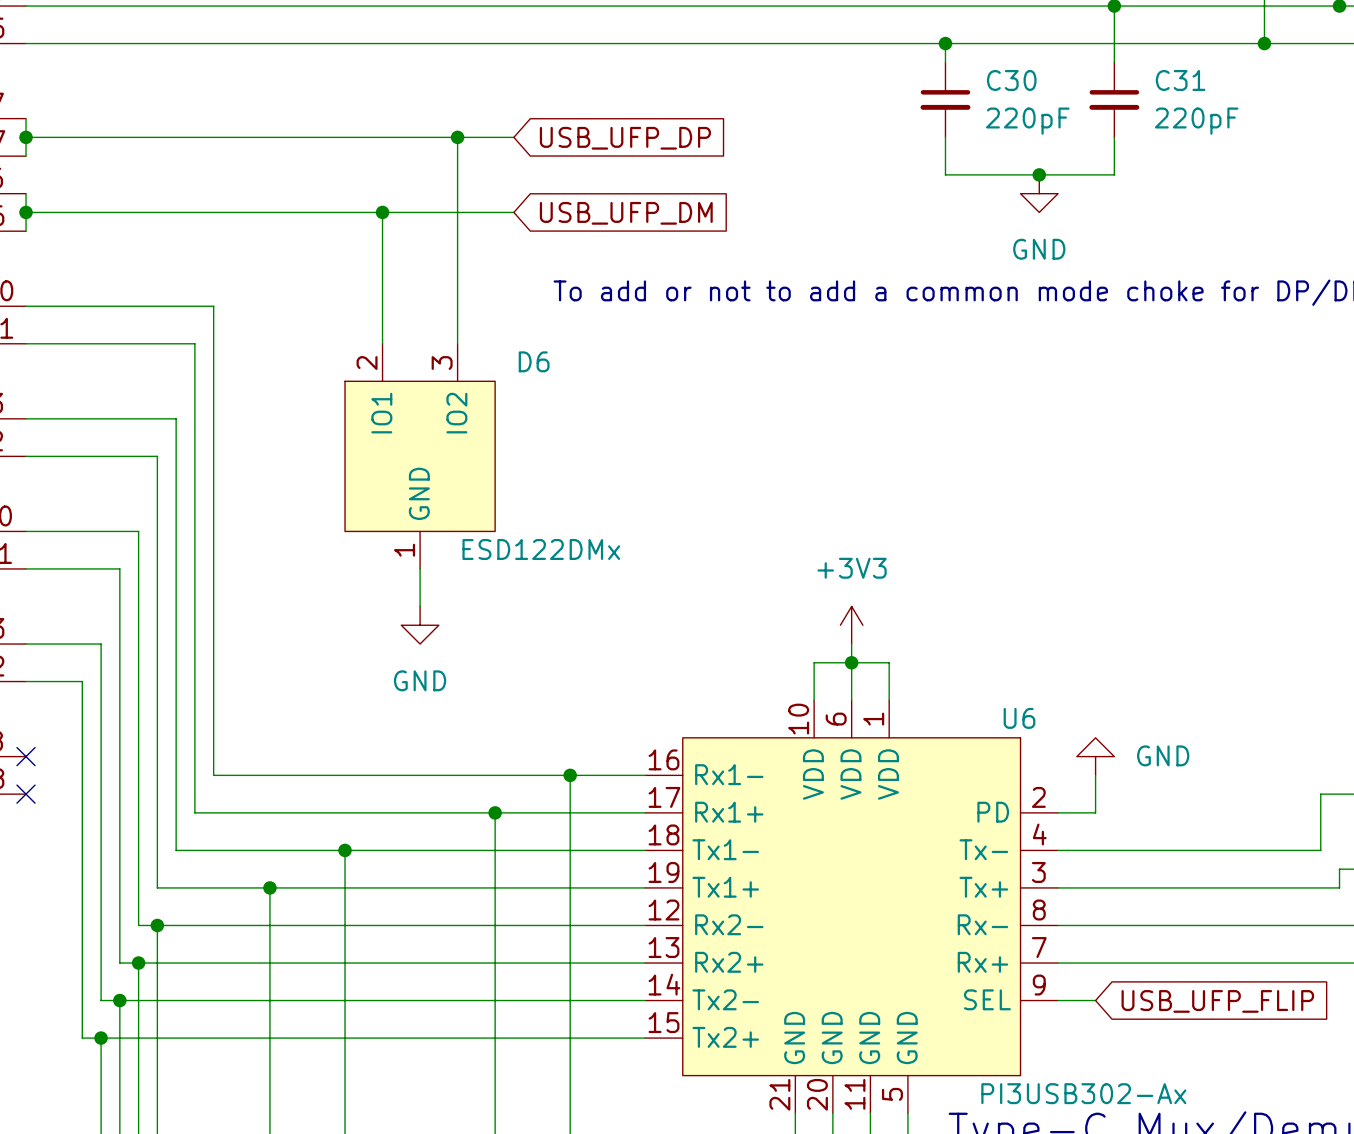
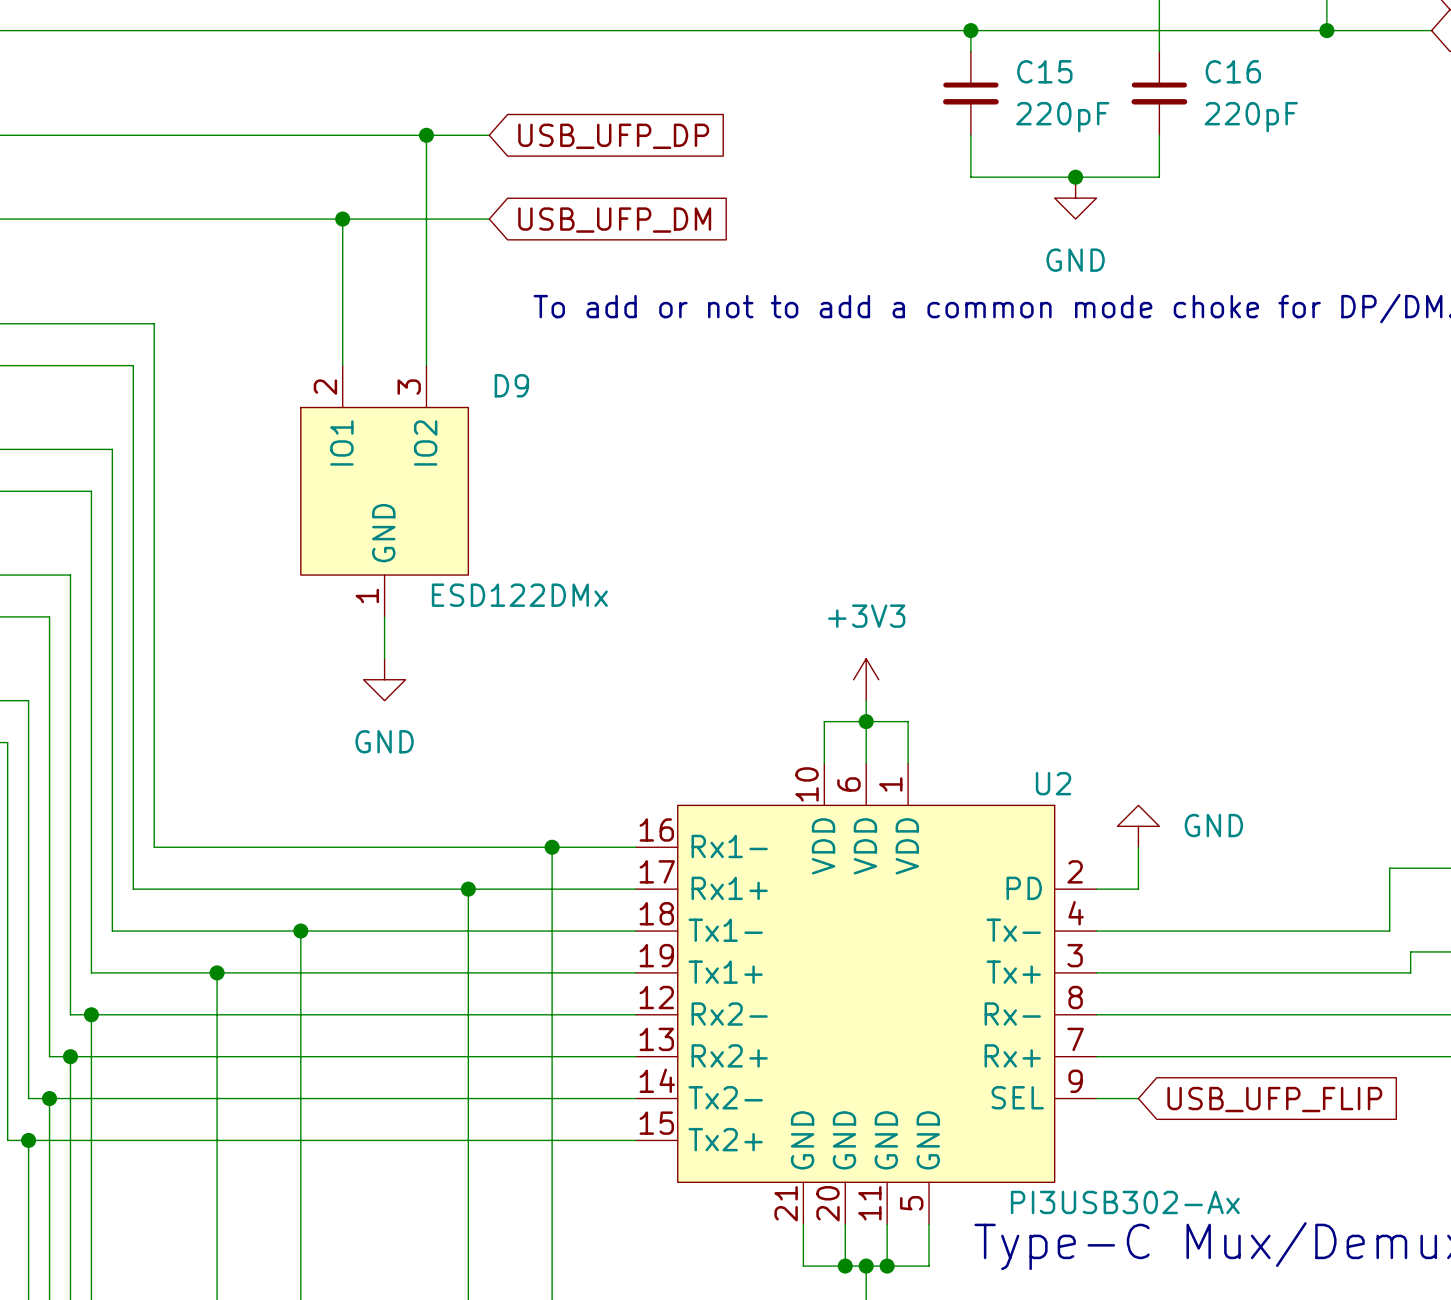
C30 name: C30 (1011, 80) -> C15 (1044, 71)
C31 name: C31 (1180, 80) -> C16 (1233, 71)
D6 name: D6 (534, 361) -> D9 (511, 385)
U6 name: U6 (1019, 718) -> U2 (1053, 783)

